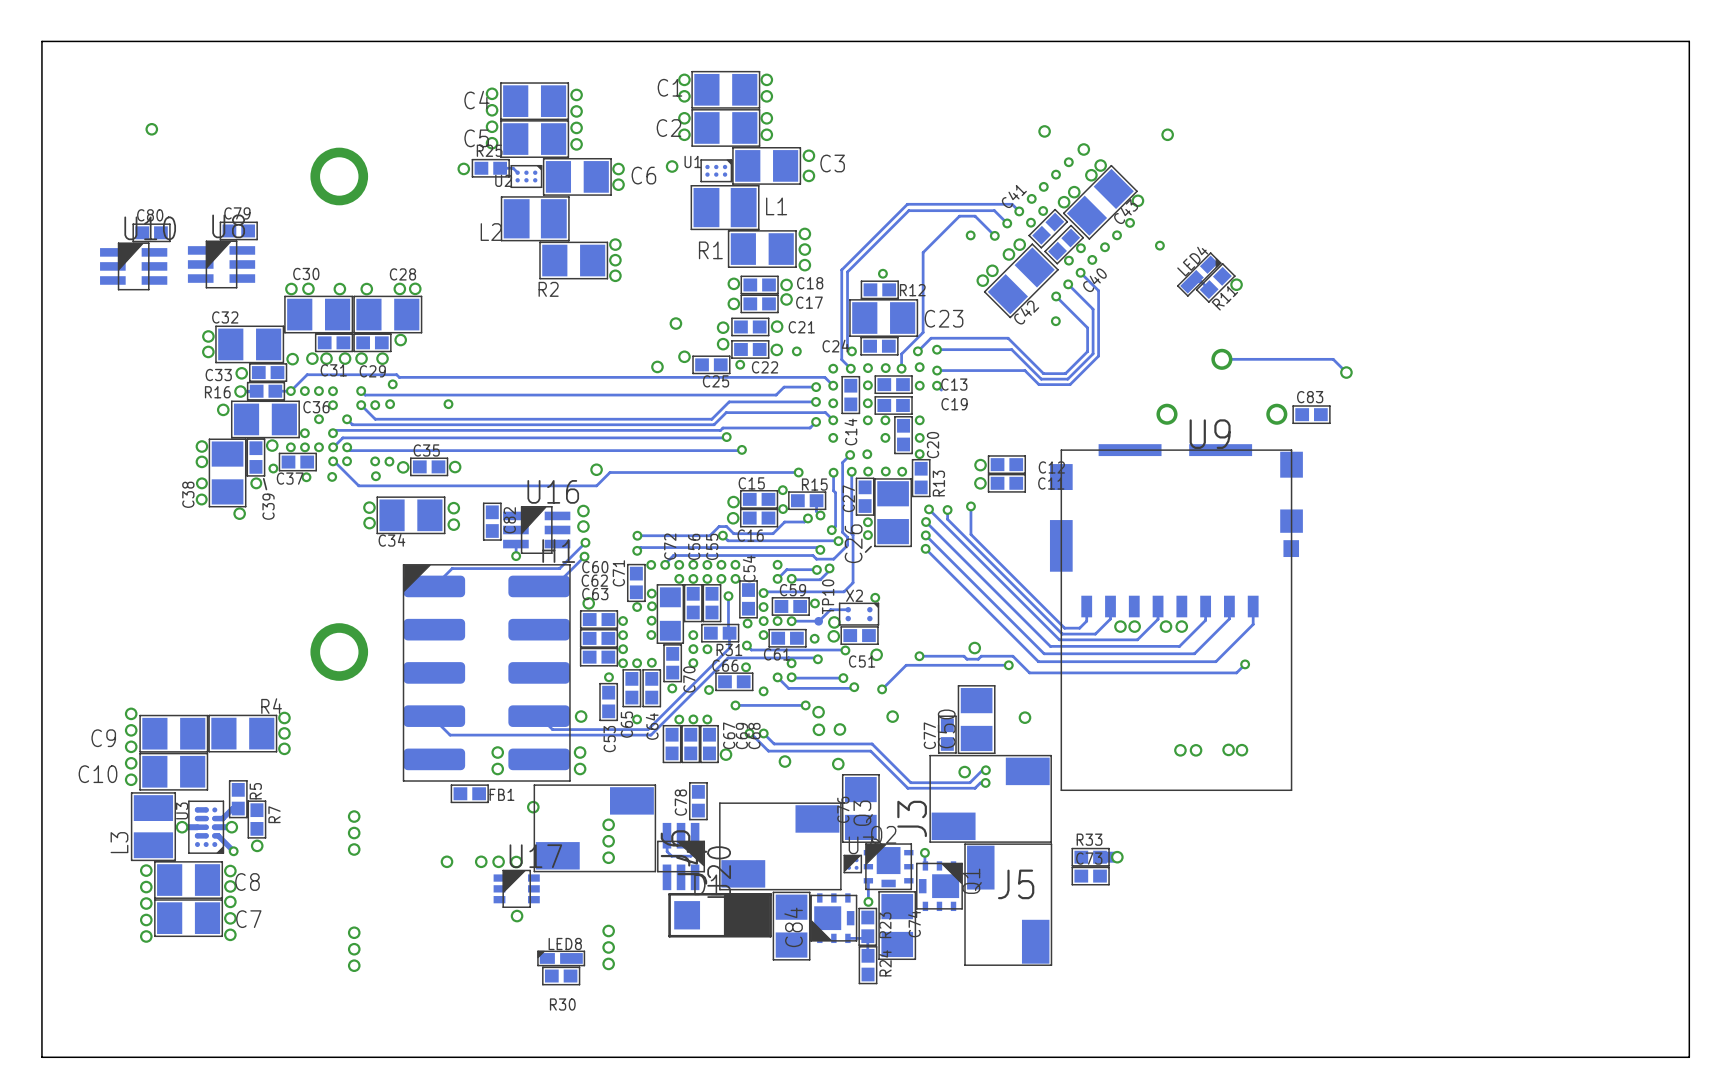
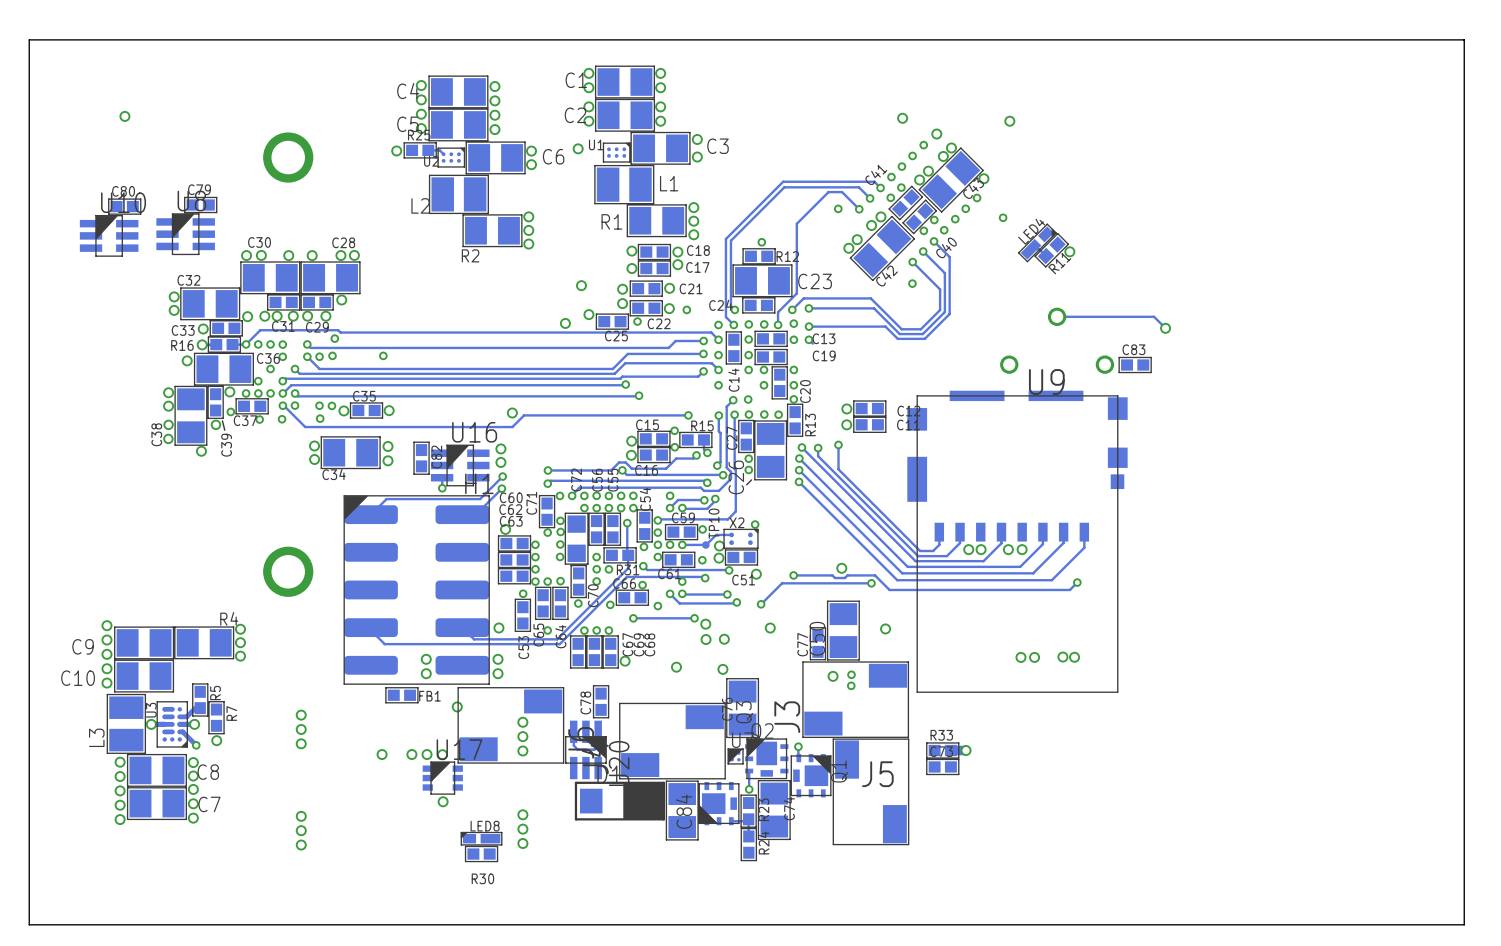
track: (749, 733) (768, 751) (870, 751) (907, 788) (975, 788) (980, 782) (985, 782) -> none
via: (749, 733) -> none
track: (763, 733) (774, 743) (872, 743) (910, 782) (969, 782) (982, 770) (985, 770) -> none
via: (763, 733) -> none

